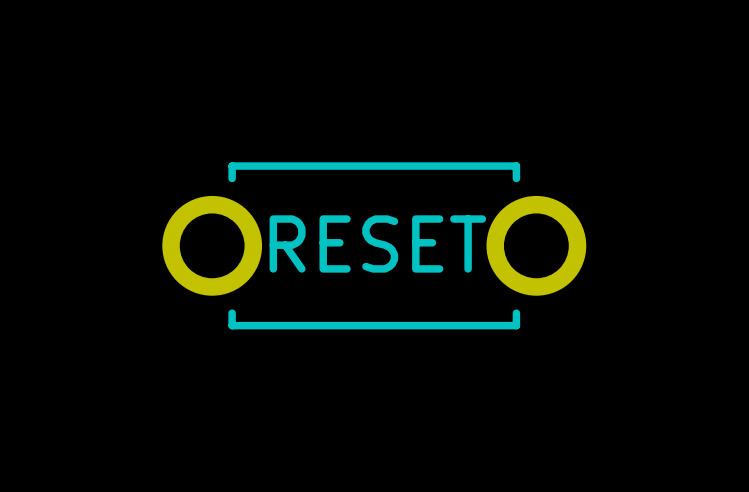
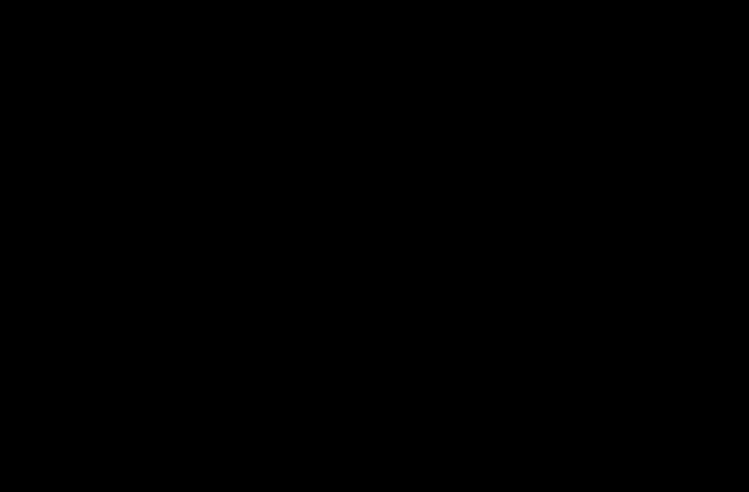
part: (374, 245) -> none

